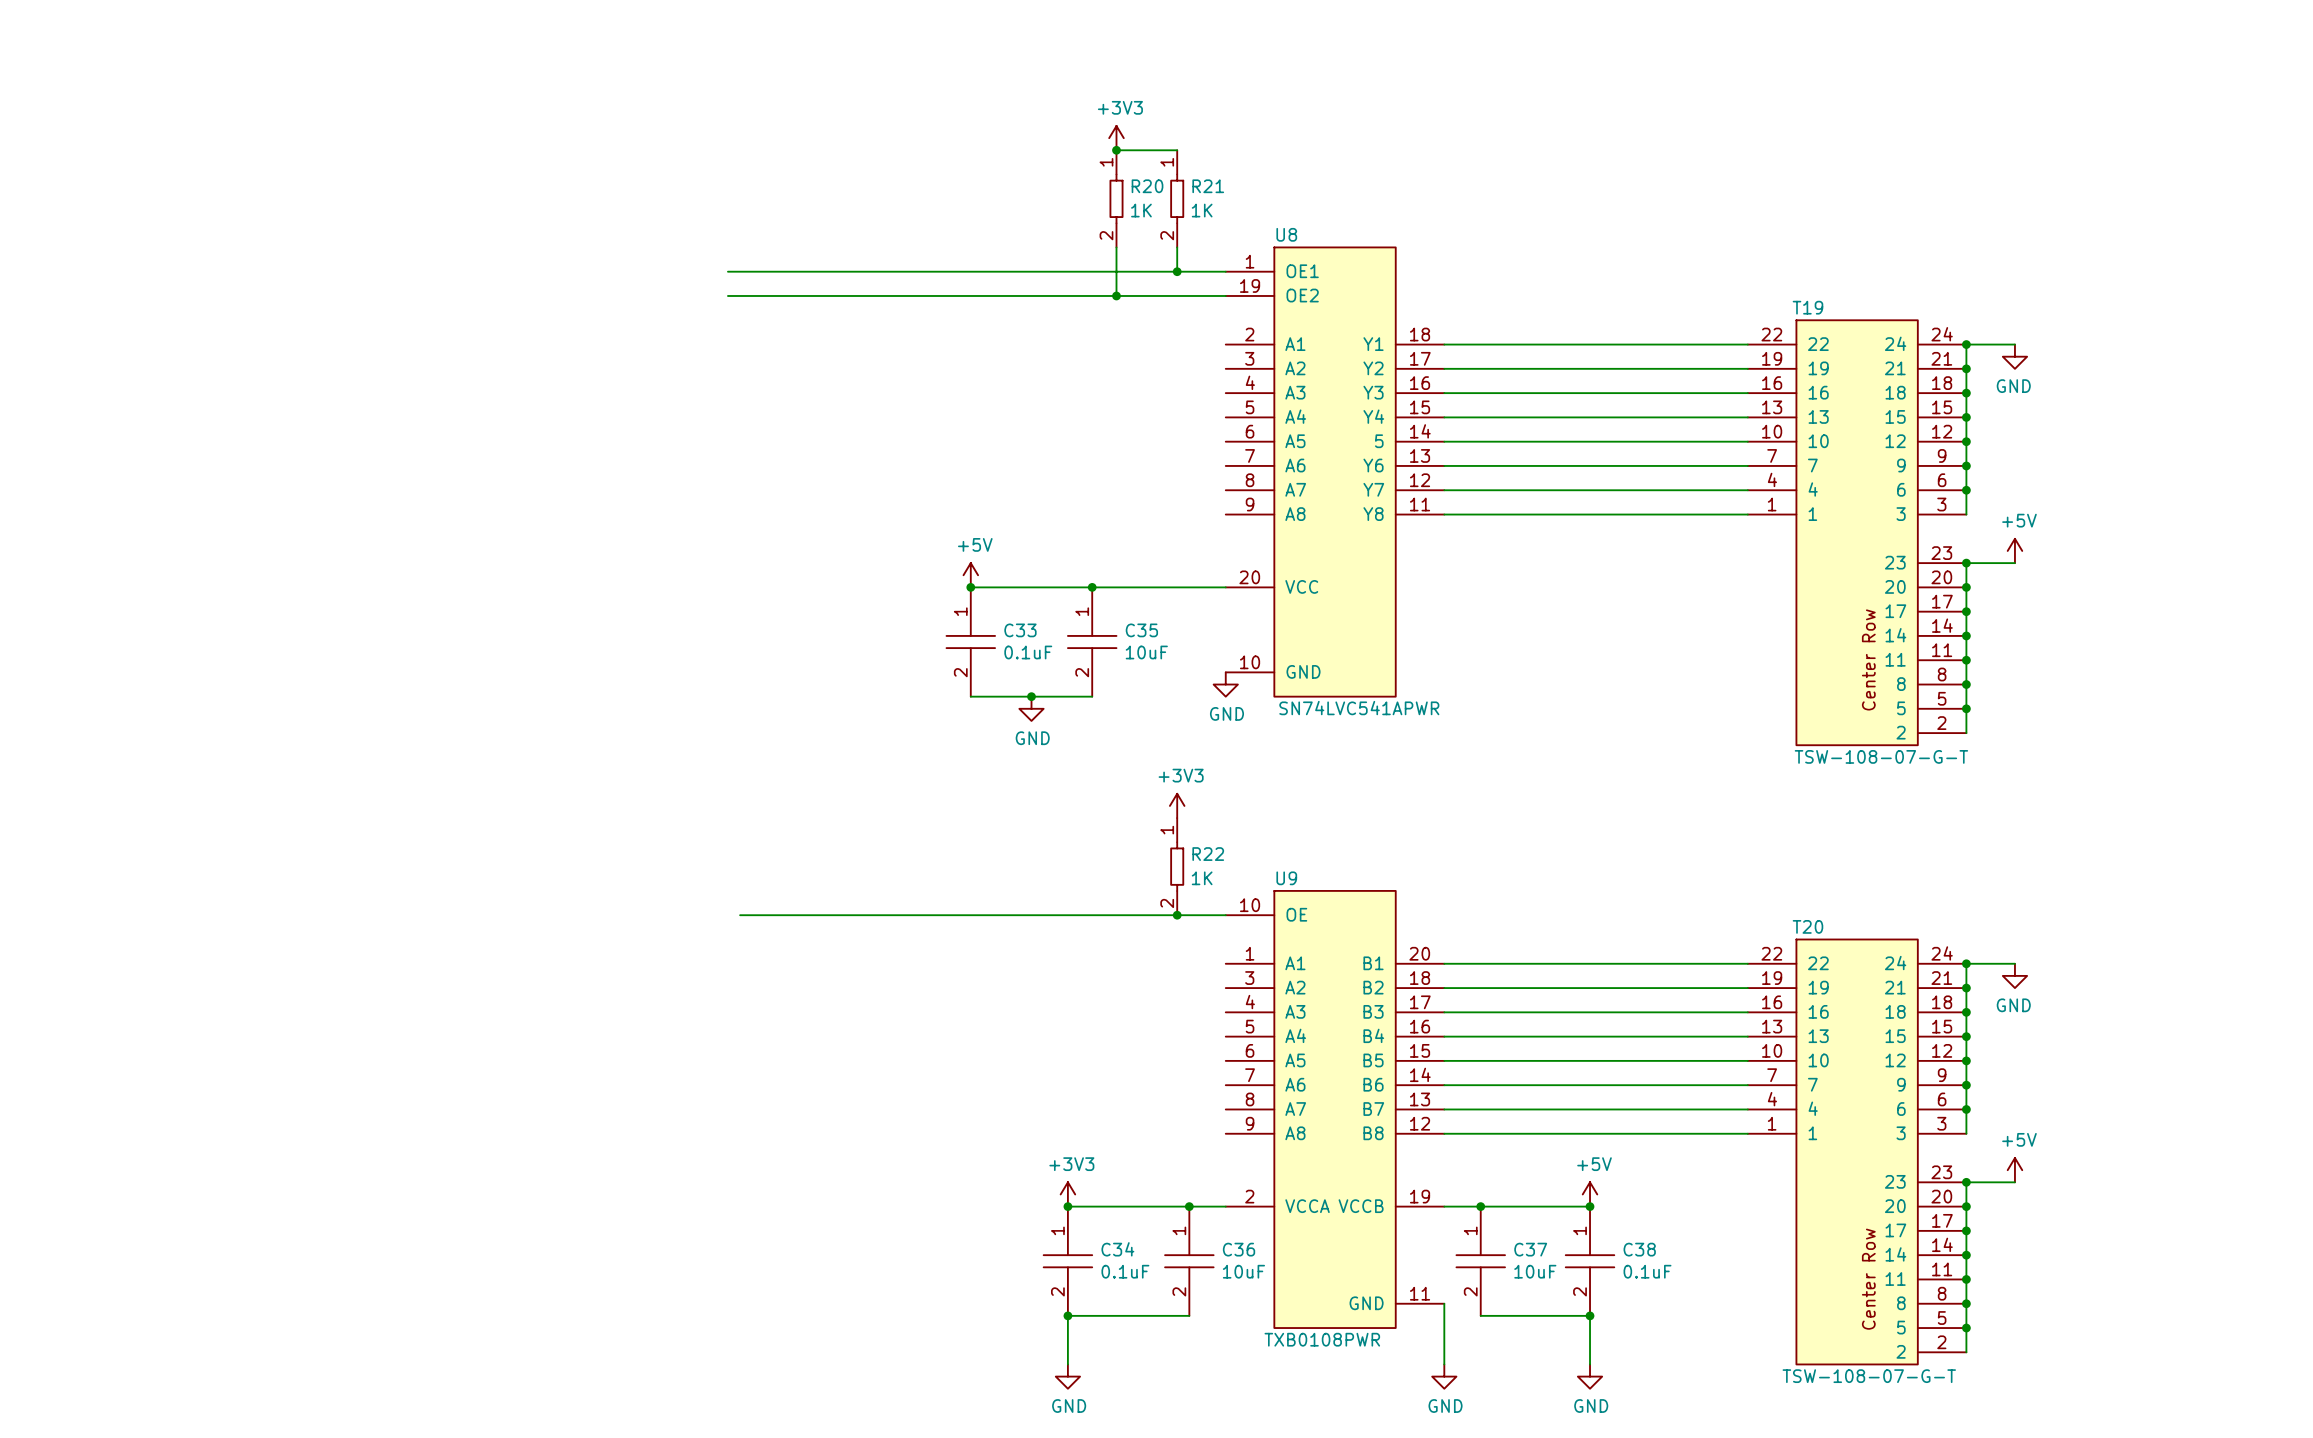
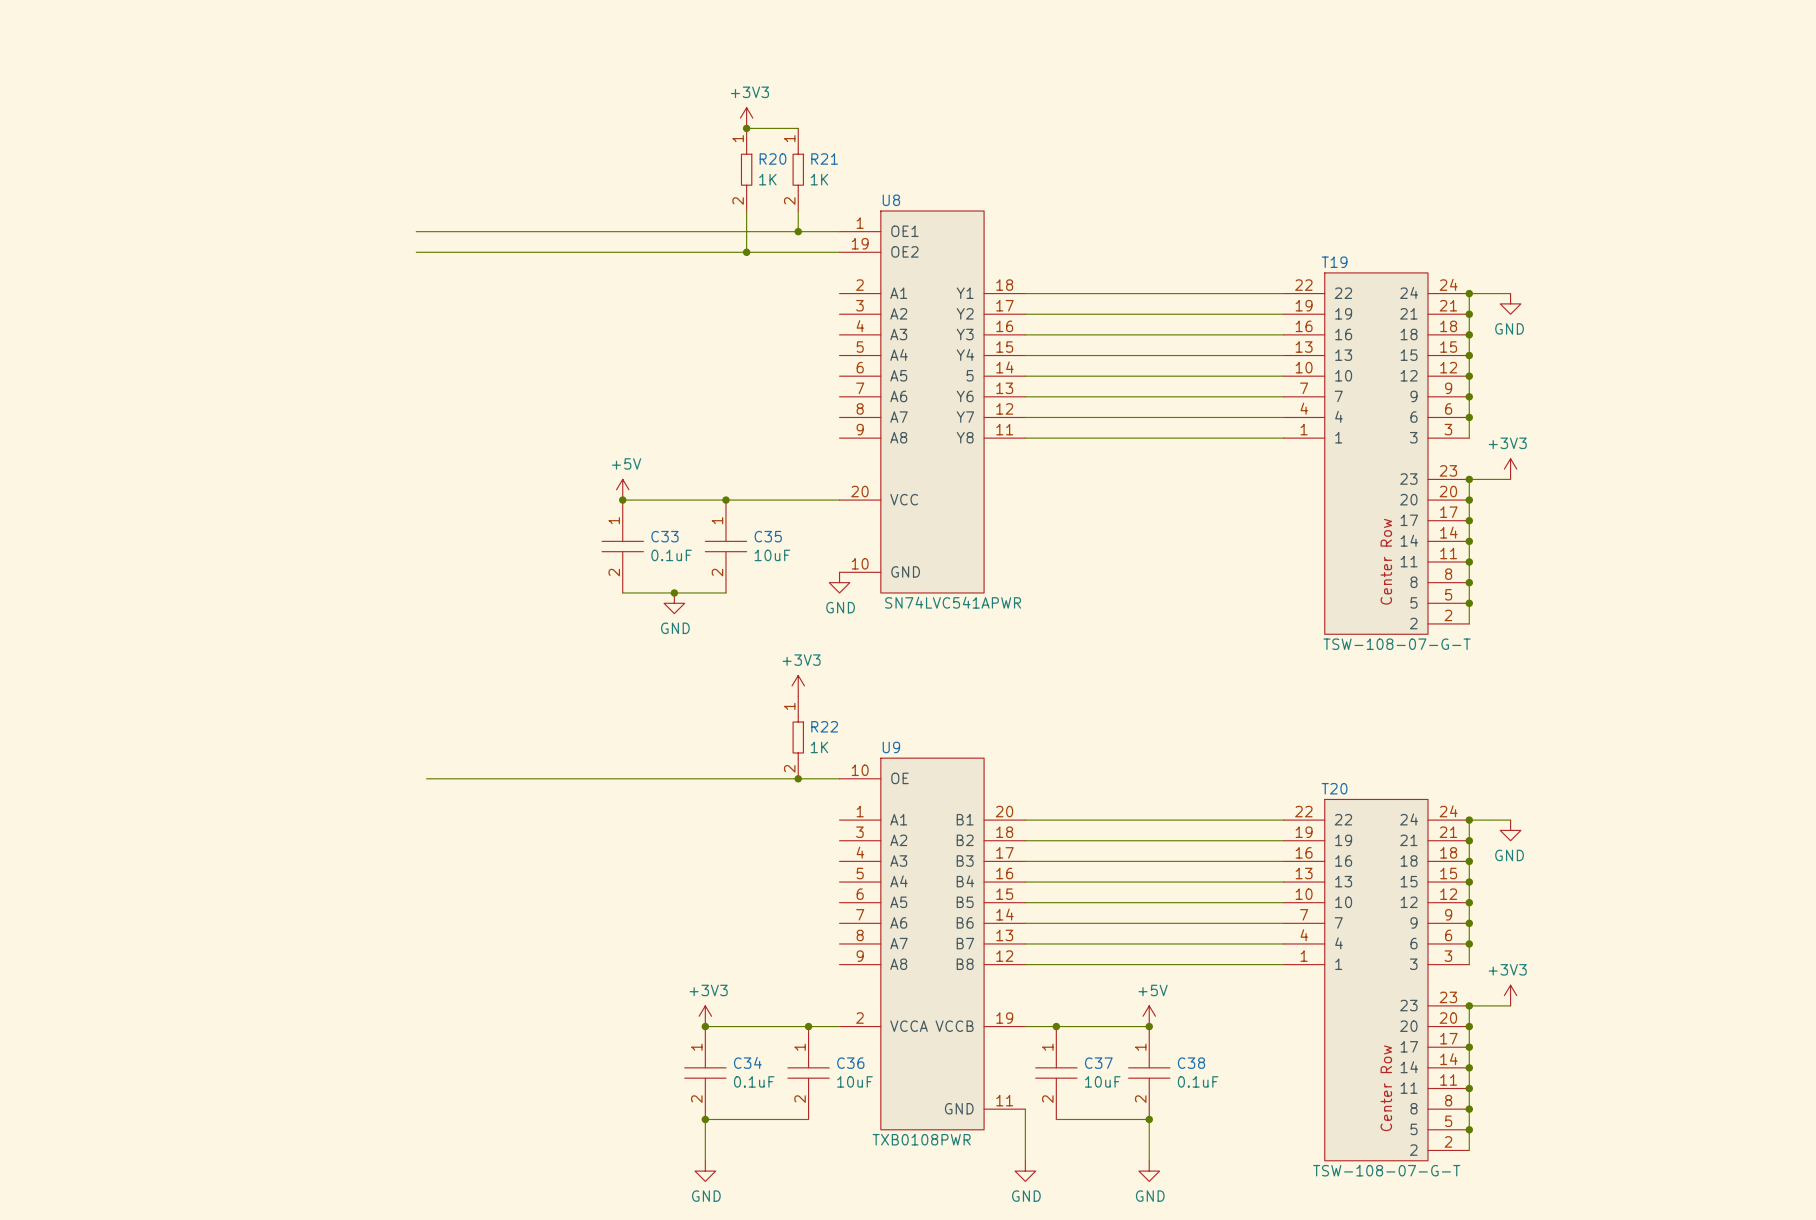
power symbol: +5V (2014, 550) -> +3V3 (1510, 469)
power symbol: +5V (2014, 1170) -> +3V3 (1510, 995)

